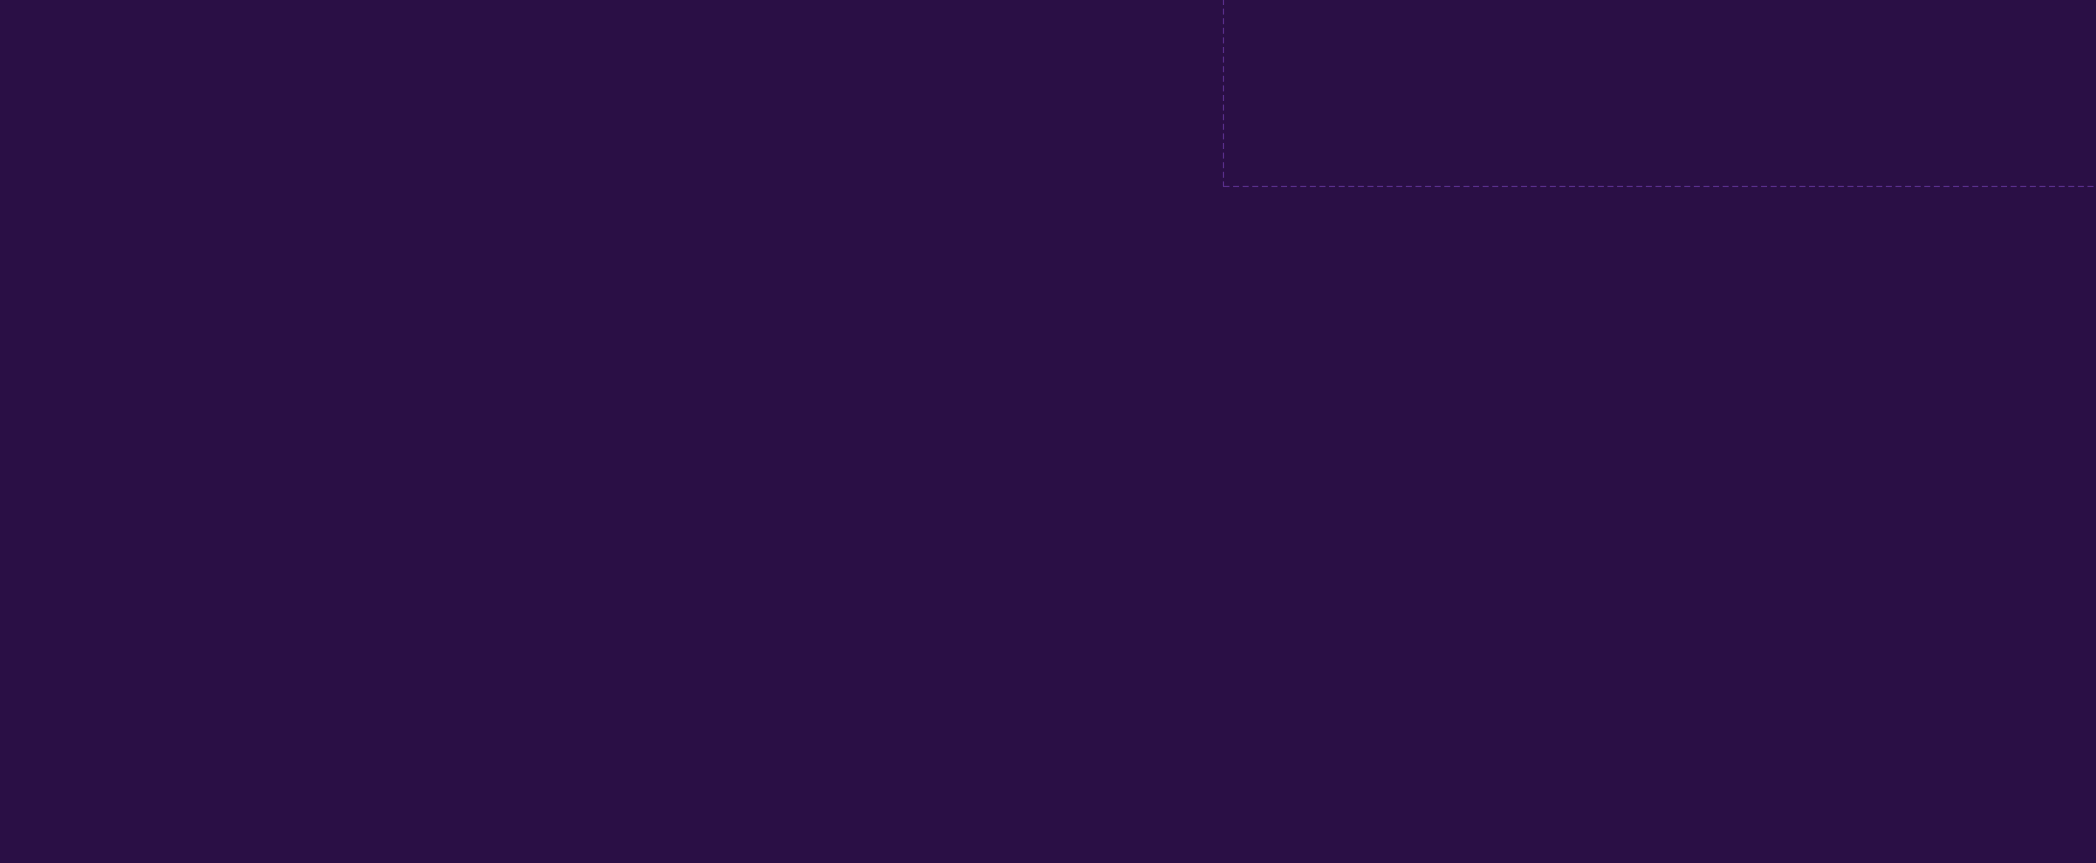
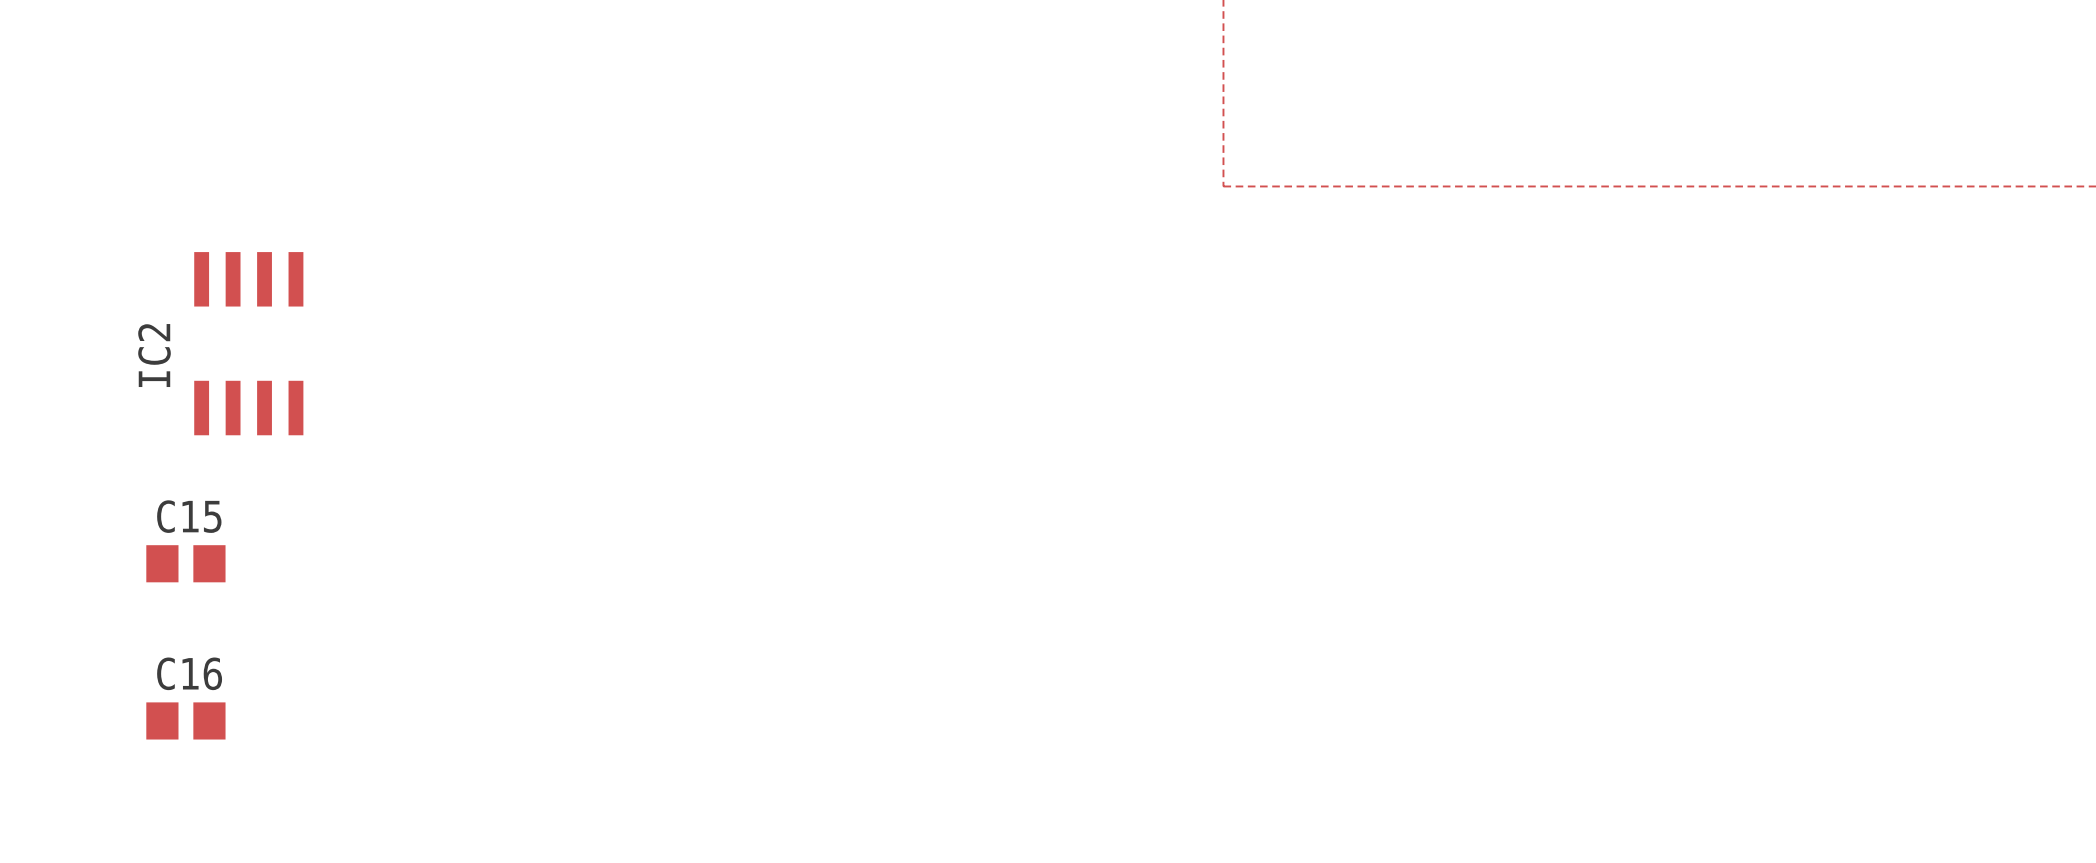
IC2: none -> (248, 343)
C15: none -> (185, 563)
C16: none -> (185, 720)

